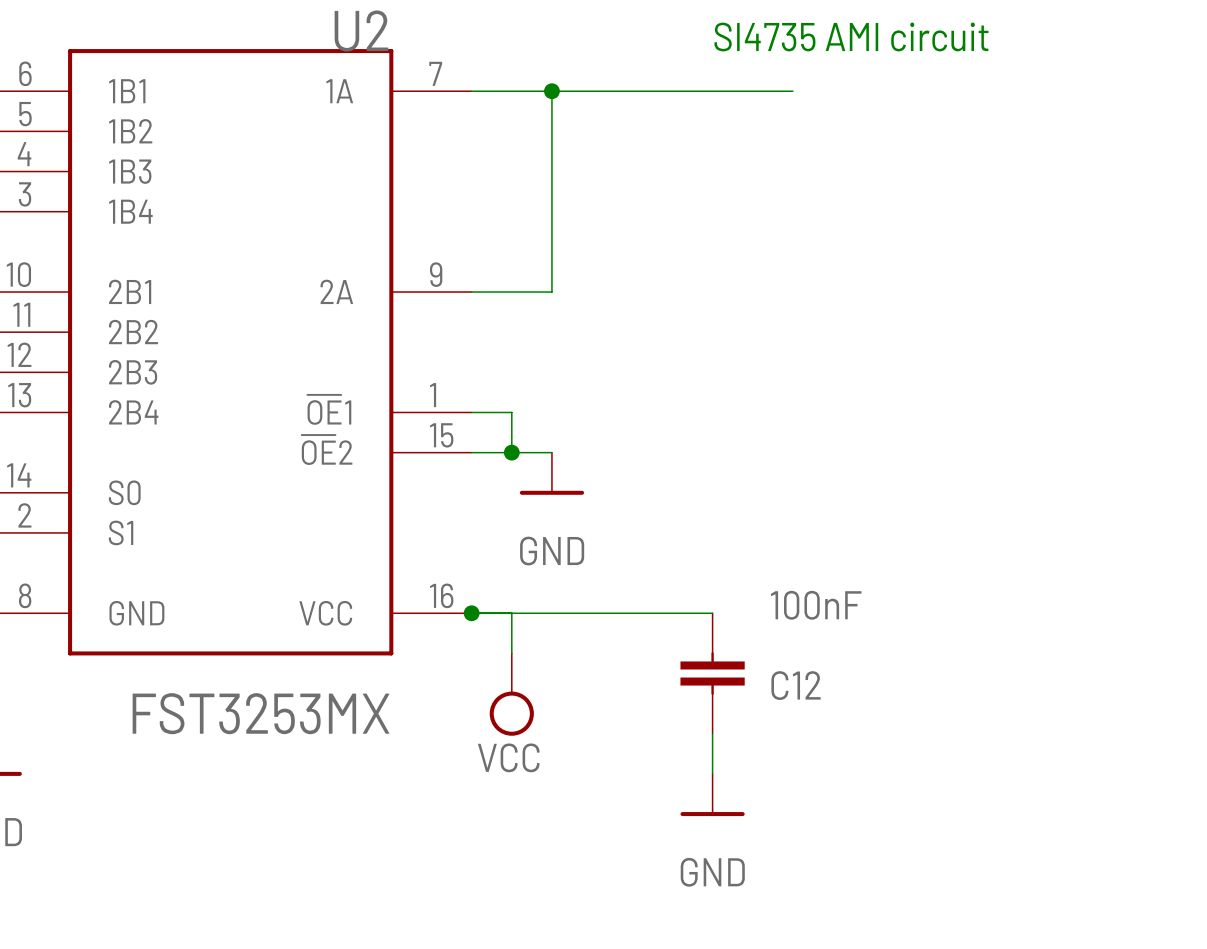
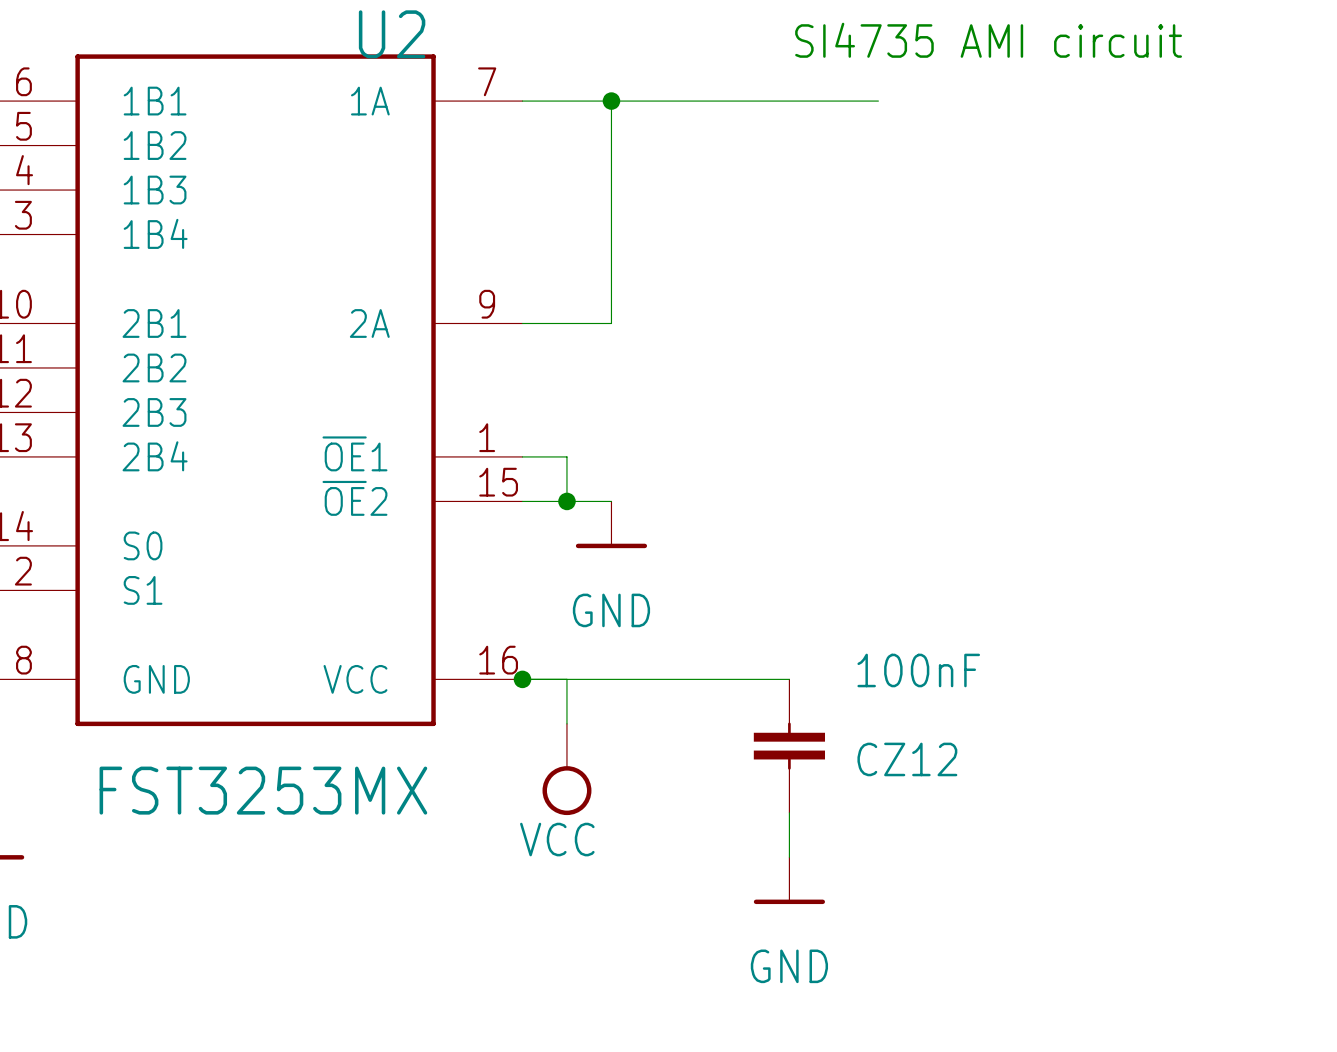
C12 name: C12 (796, 685) -> CZ12 (907, 759)

